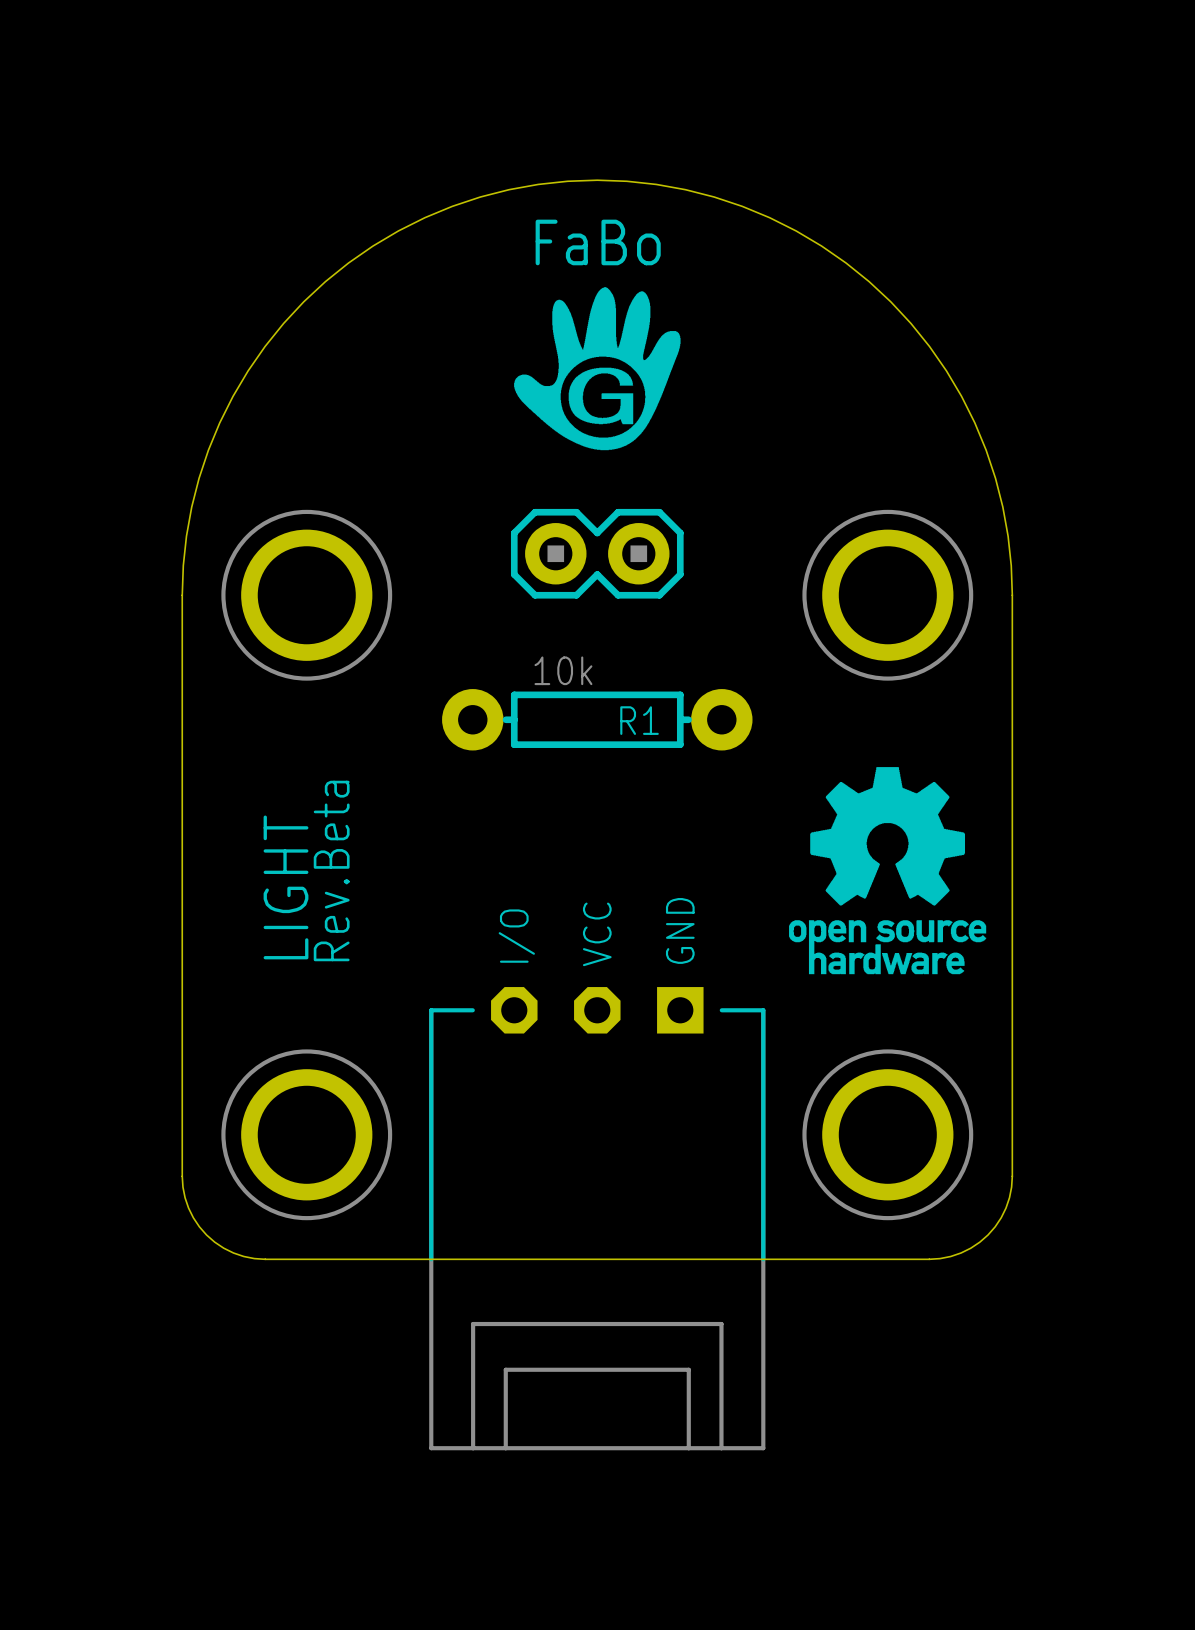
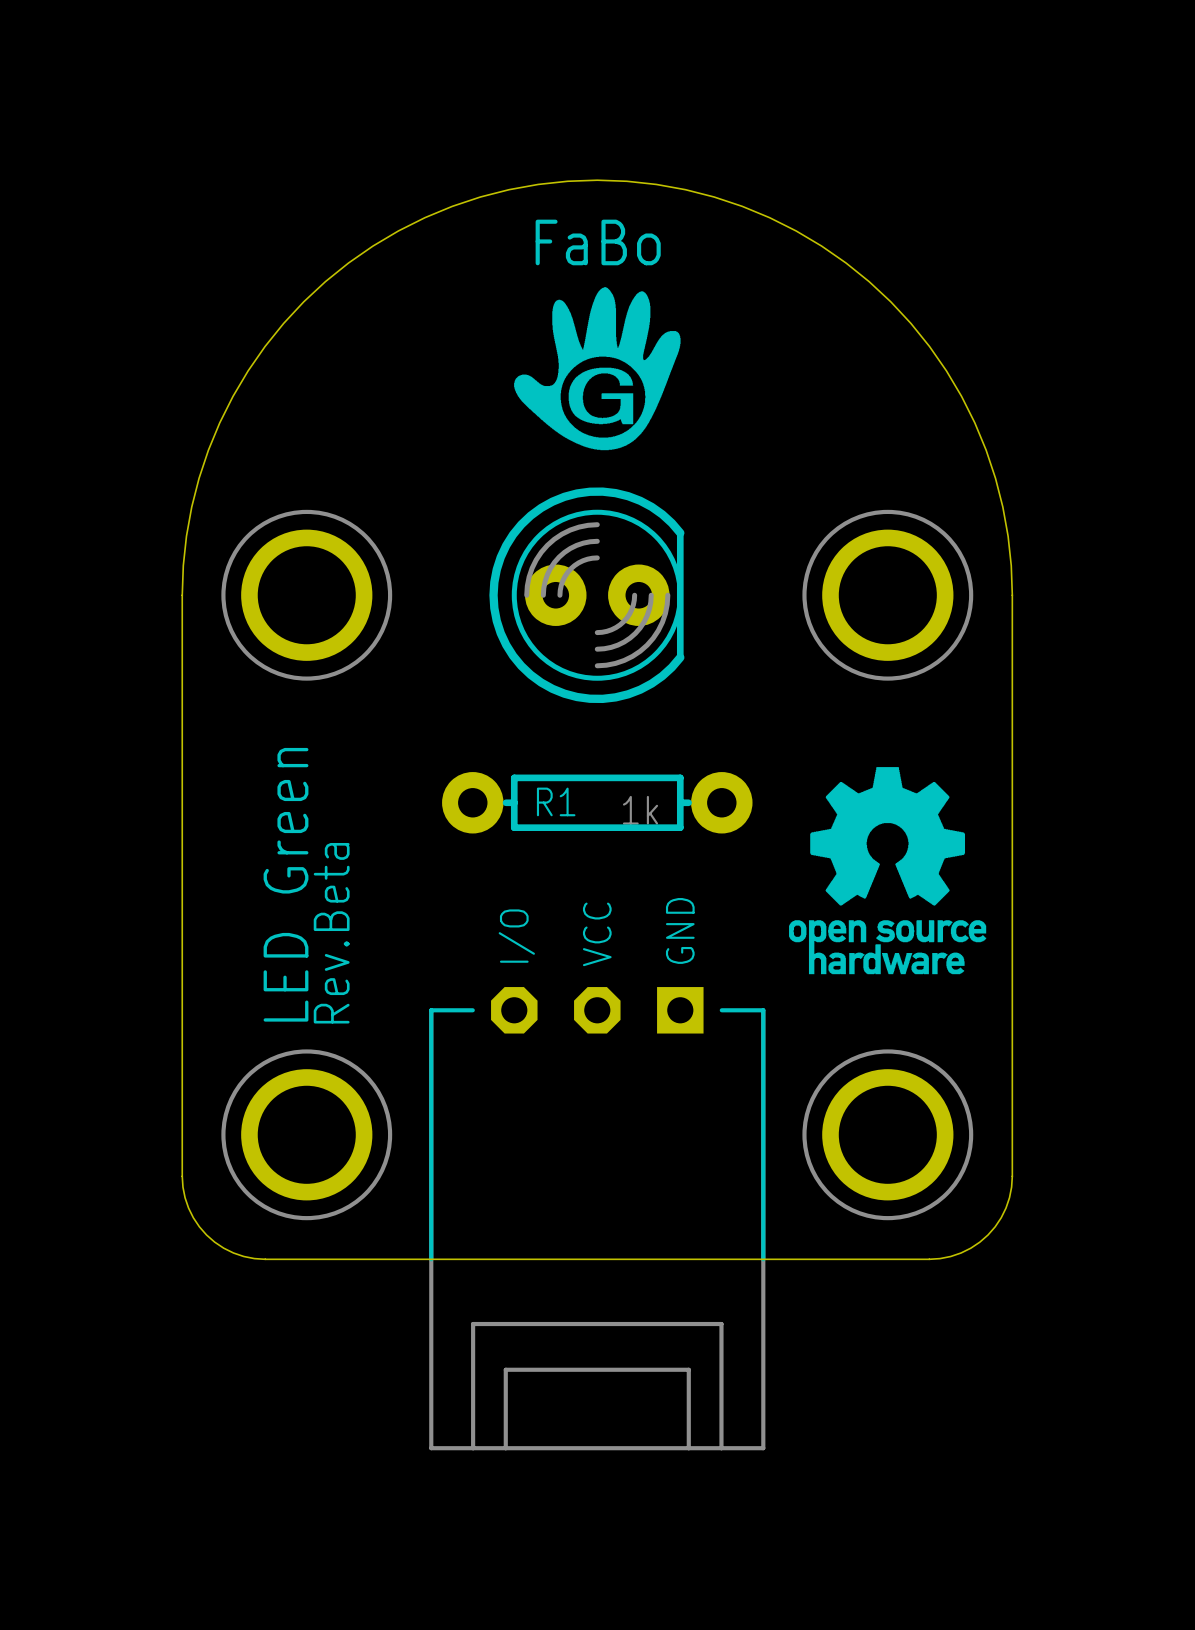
part: (597, 553) -> none
part: none -> (586, 595)
R1 value: 10k (563, 670) -> 1k (640, 810)
R1 position: (597, 719) -> (597, 802)
R1 name position: R1 (639, 720) -> R1 (556, 801)
text position: Rev.Beta (331, 870) -> Rev.Beta (331, 933)
text: none -> LED Green (286, 884)
text: LIGHT (286, 887) -> none

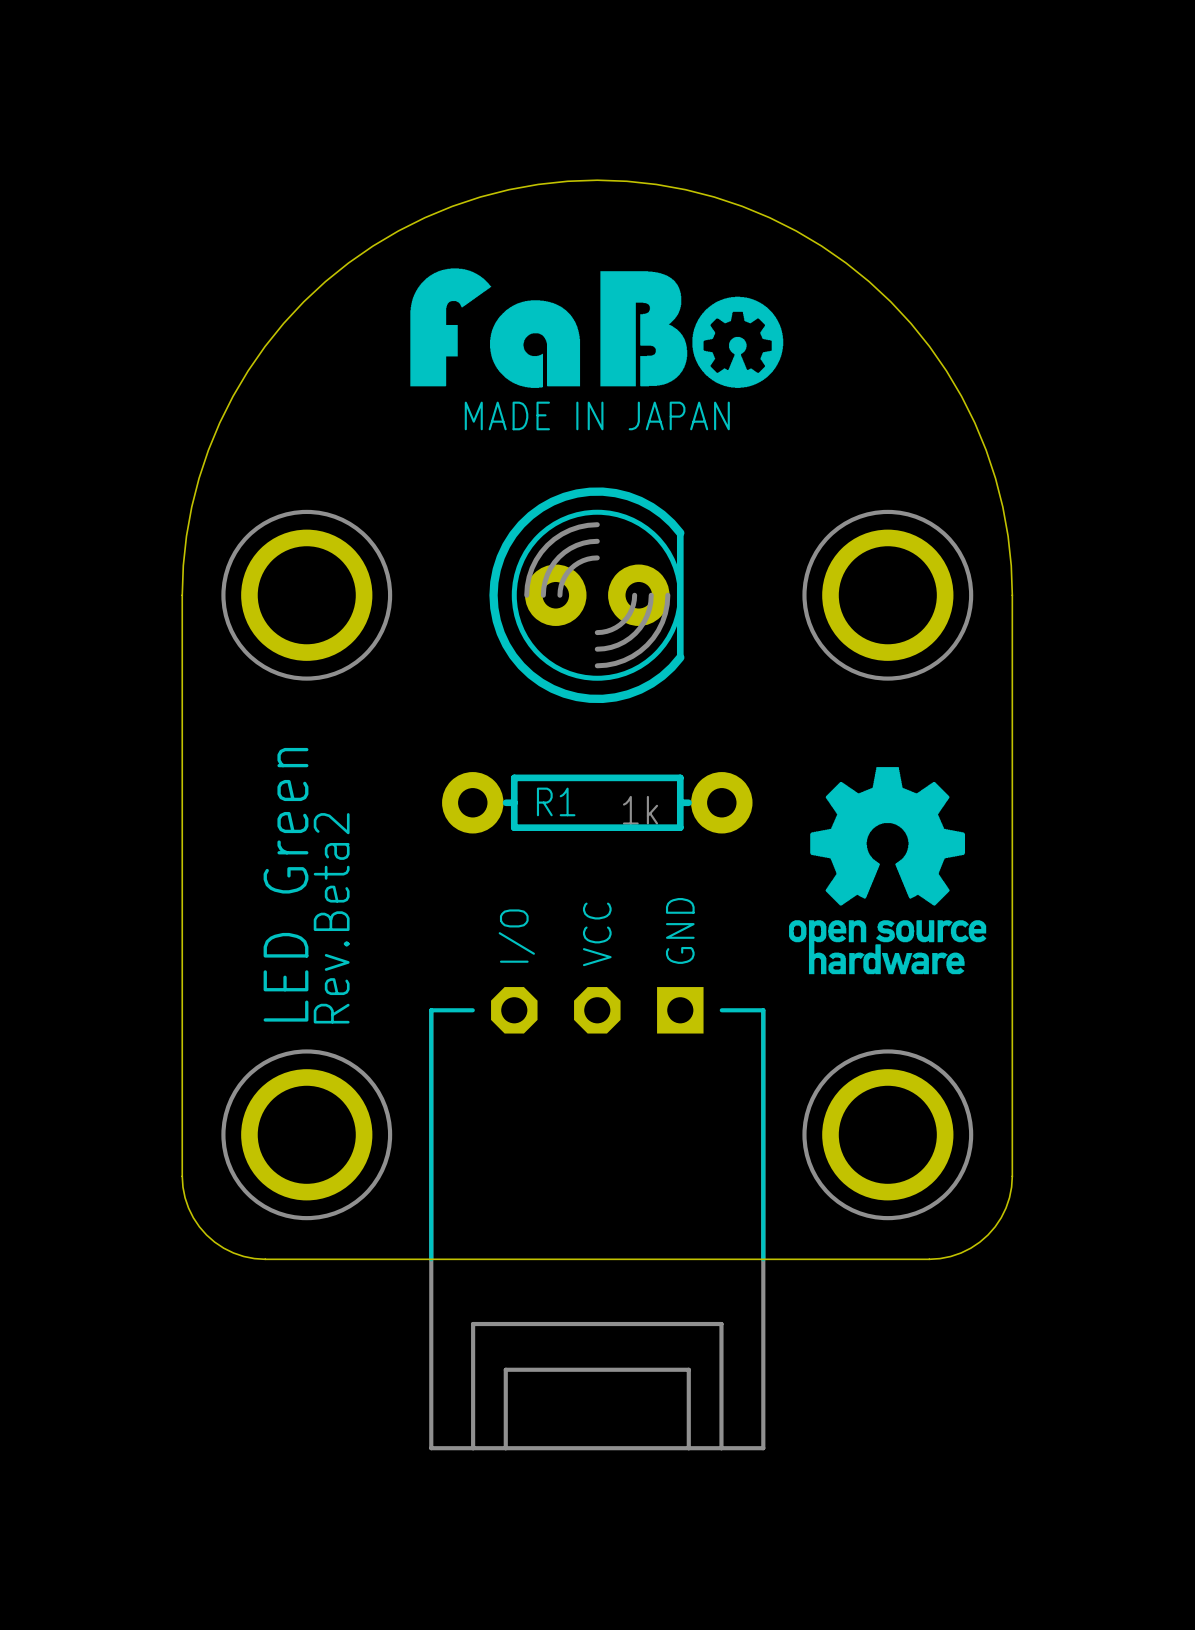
drawing: none -> [410, 268, 784, 388]
drawing: [514, 287, 681, 451] -> none
text: none -> MADE IN JAPAN (597, 415)
text: Rev.Beta (331, 933) -> Rev.Beta2 (331, 918)

